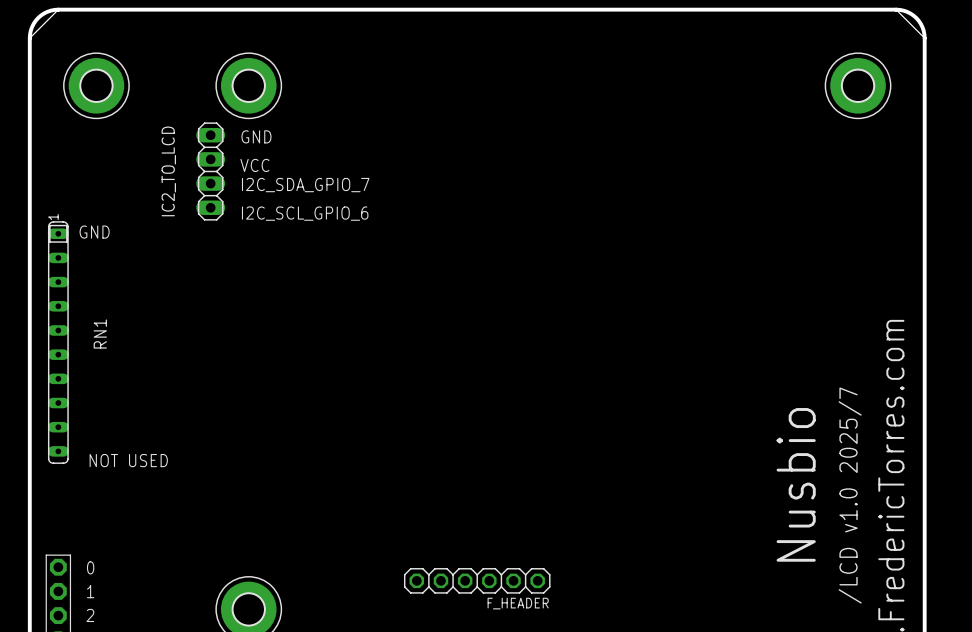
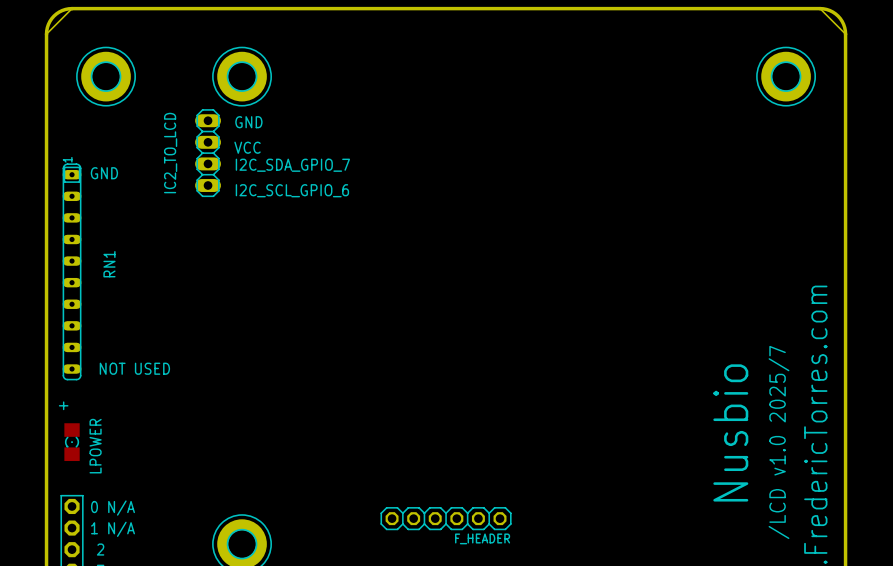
text position: GND (94, 232) -> GND (104, 173)
RN1 position: (58, 342) -> (72, 271)
text: none -> + (63, 405)
text position: NOT USED (128, 460) -> NOT USED (134, 368)
LPOWER: none -> (72, 442)
text: 0 (90, 567) -> none
text: none -> 0 N/A (113, 508)
text: 1 (90, 591) -> none
text: none -> 1 N/A (113, 529)

